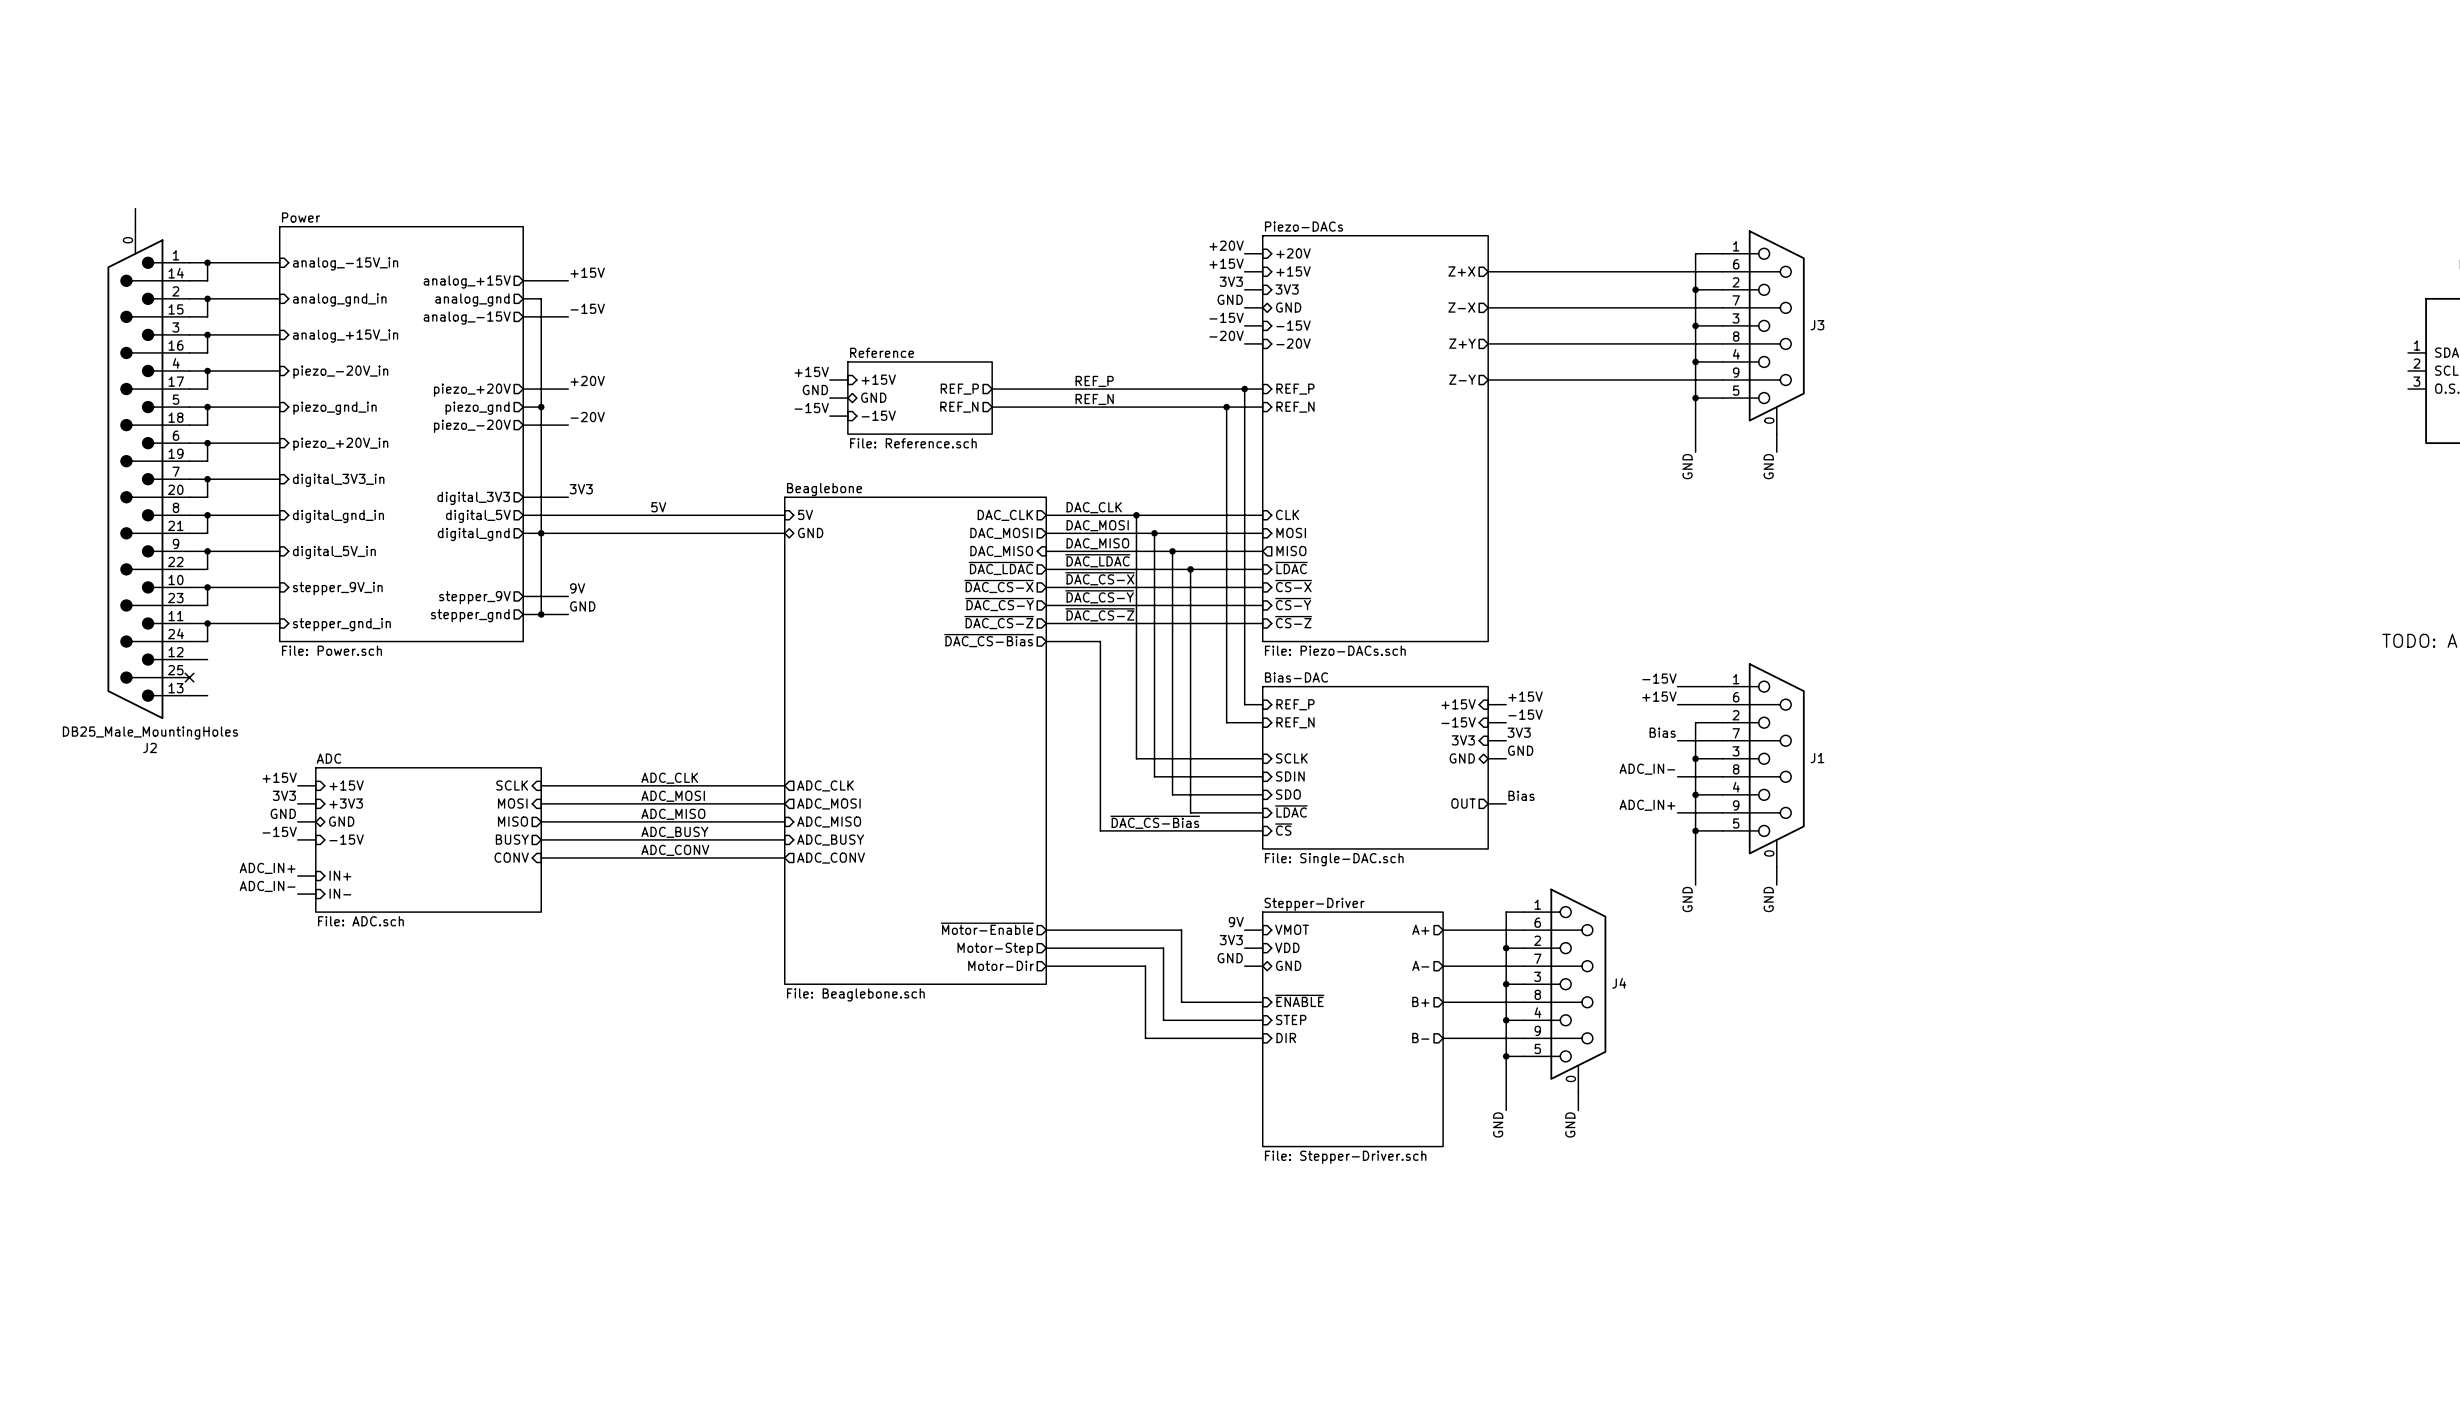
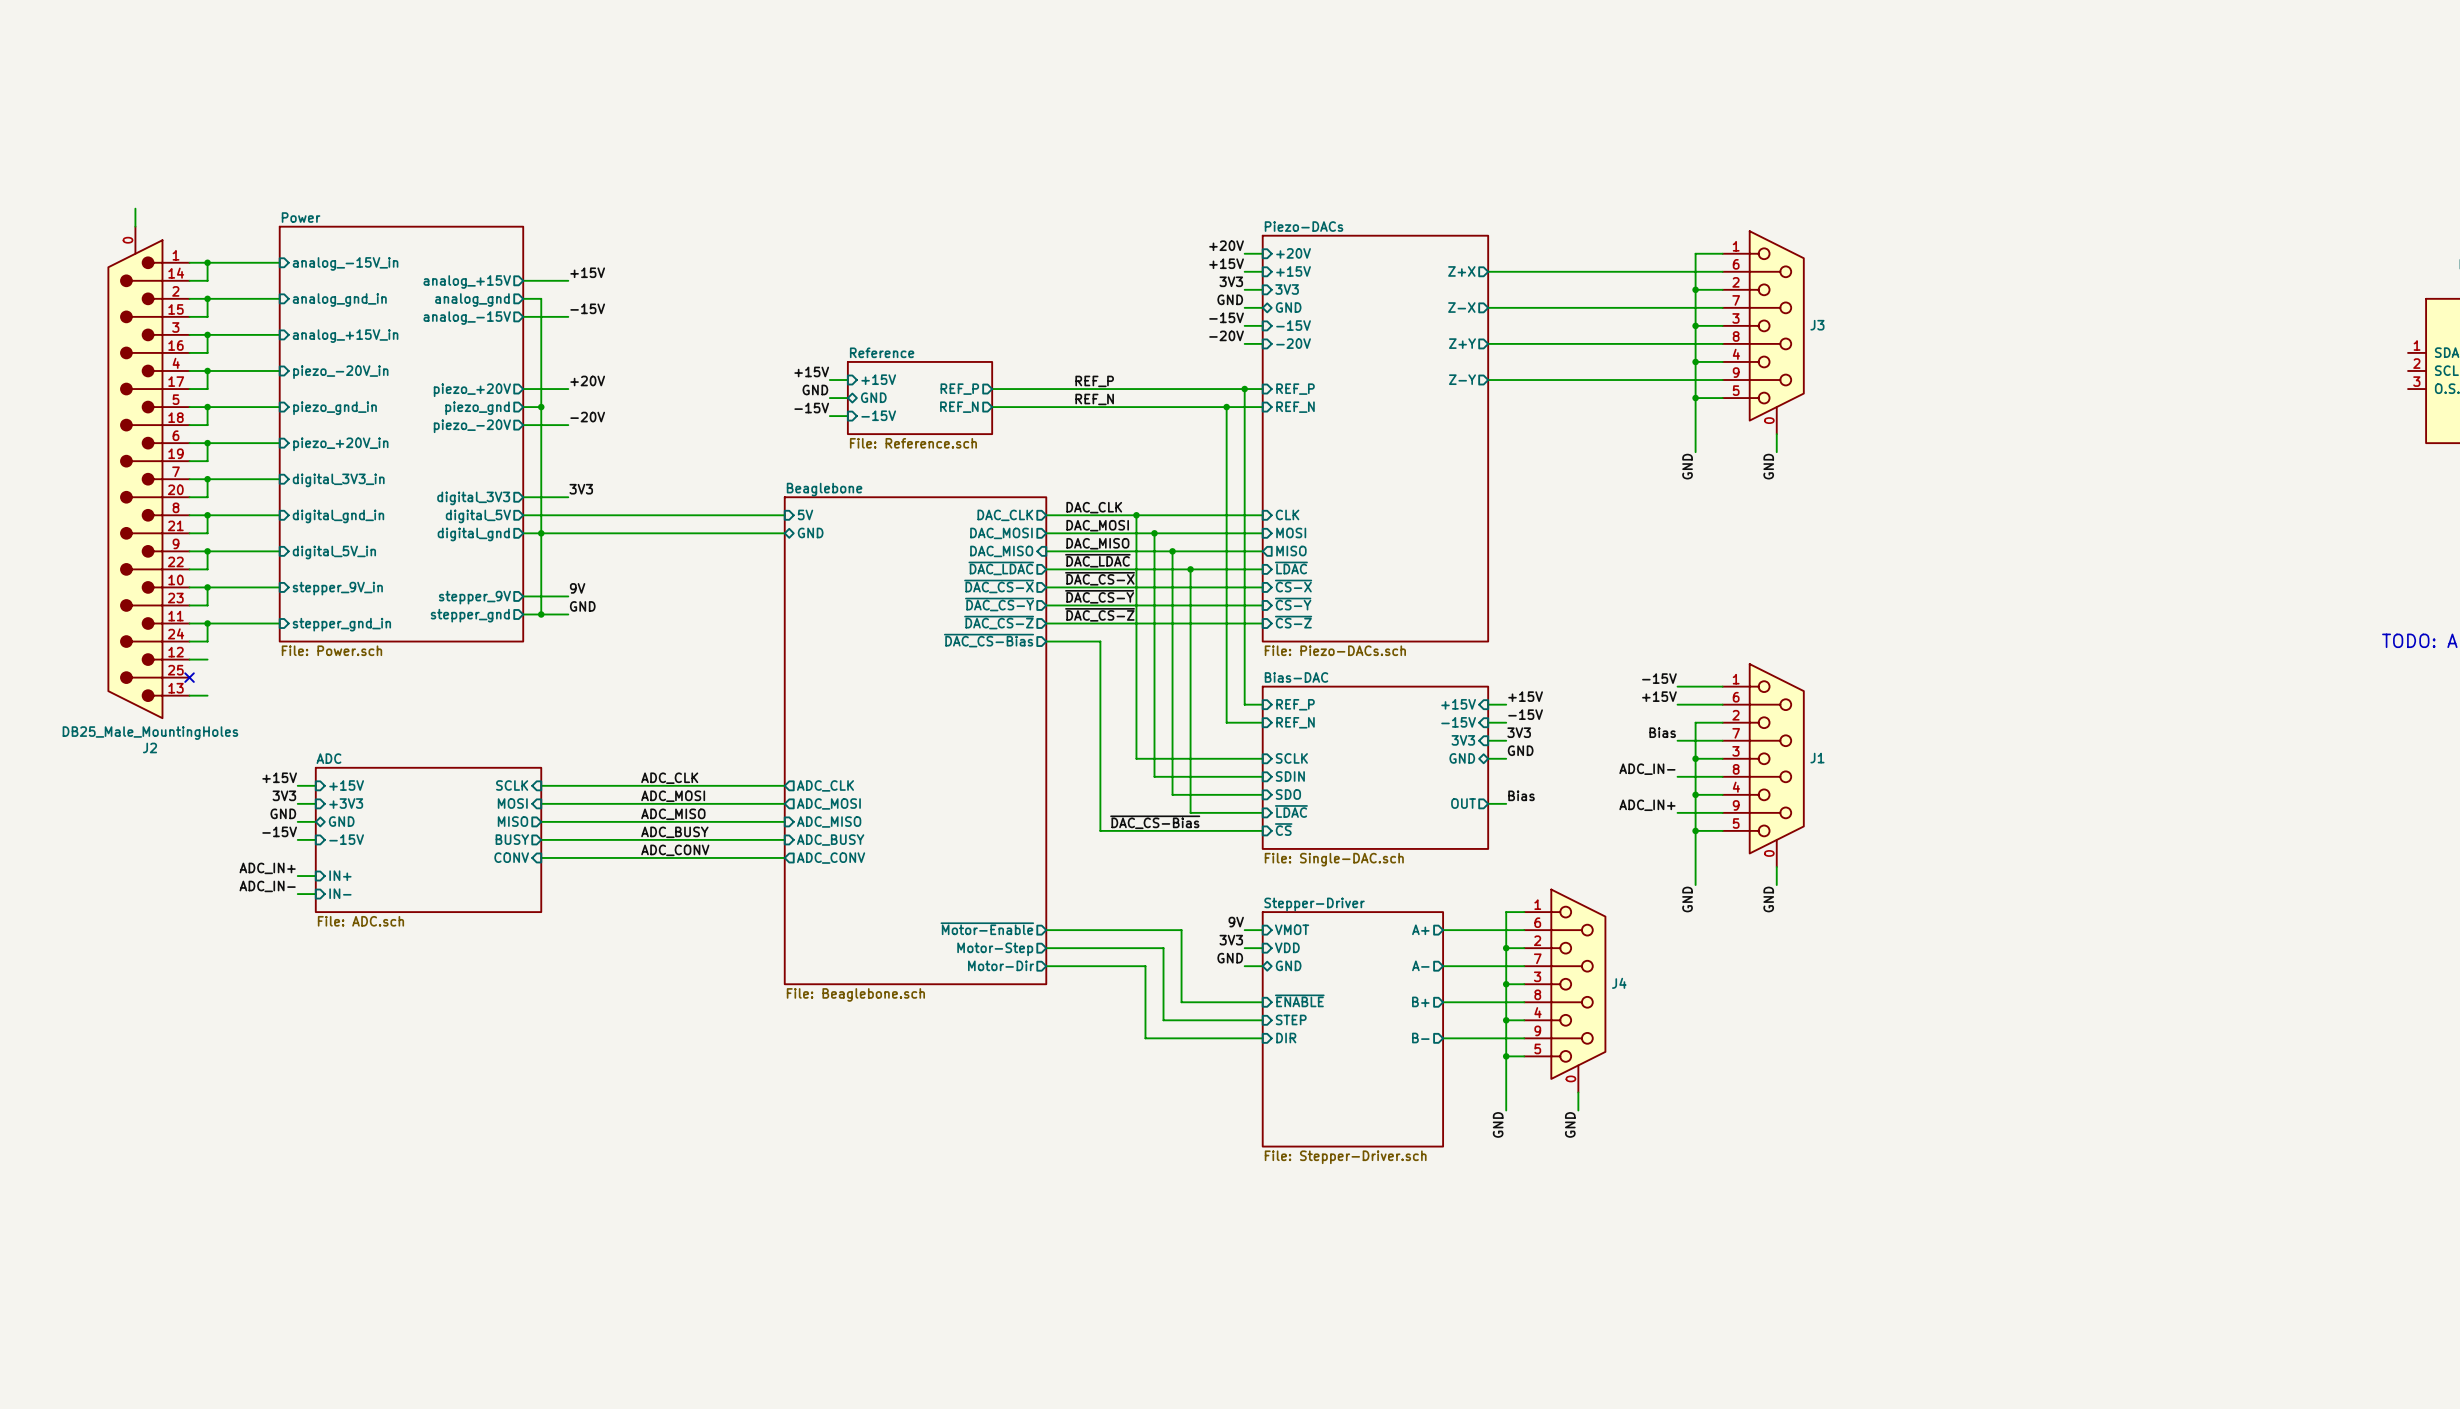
label: 5V (658, 507) -> none

